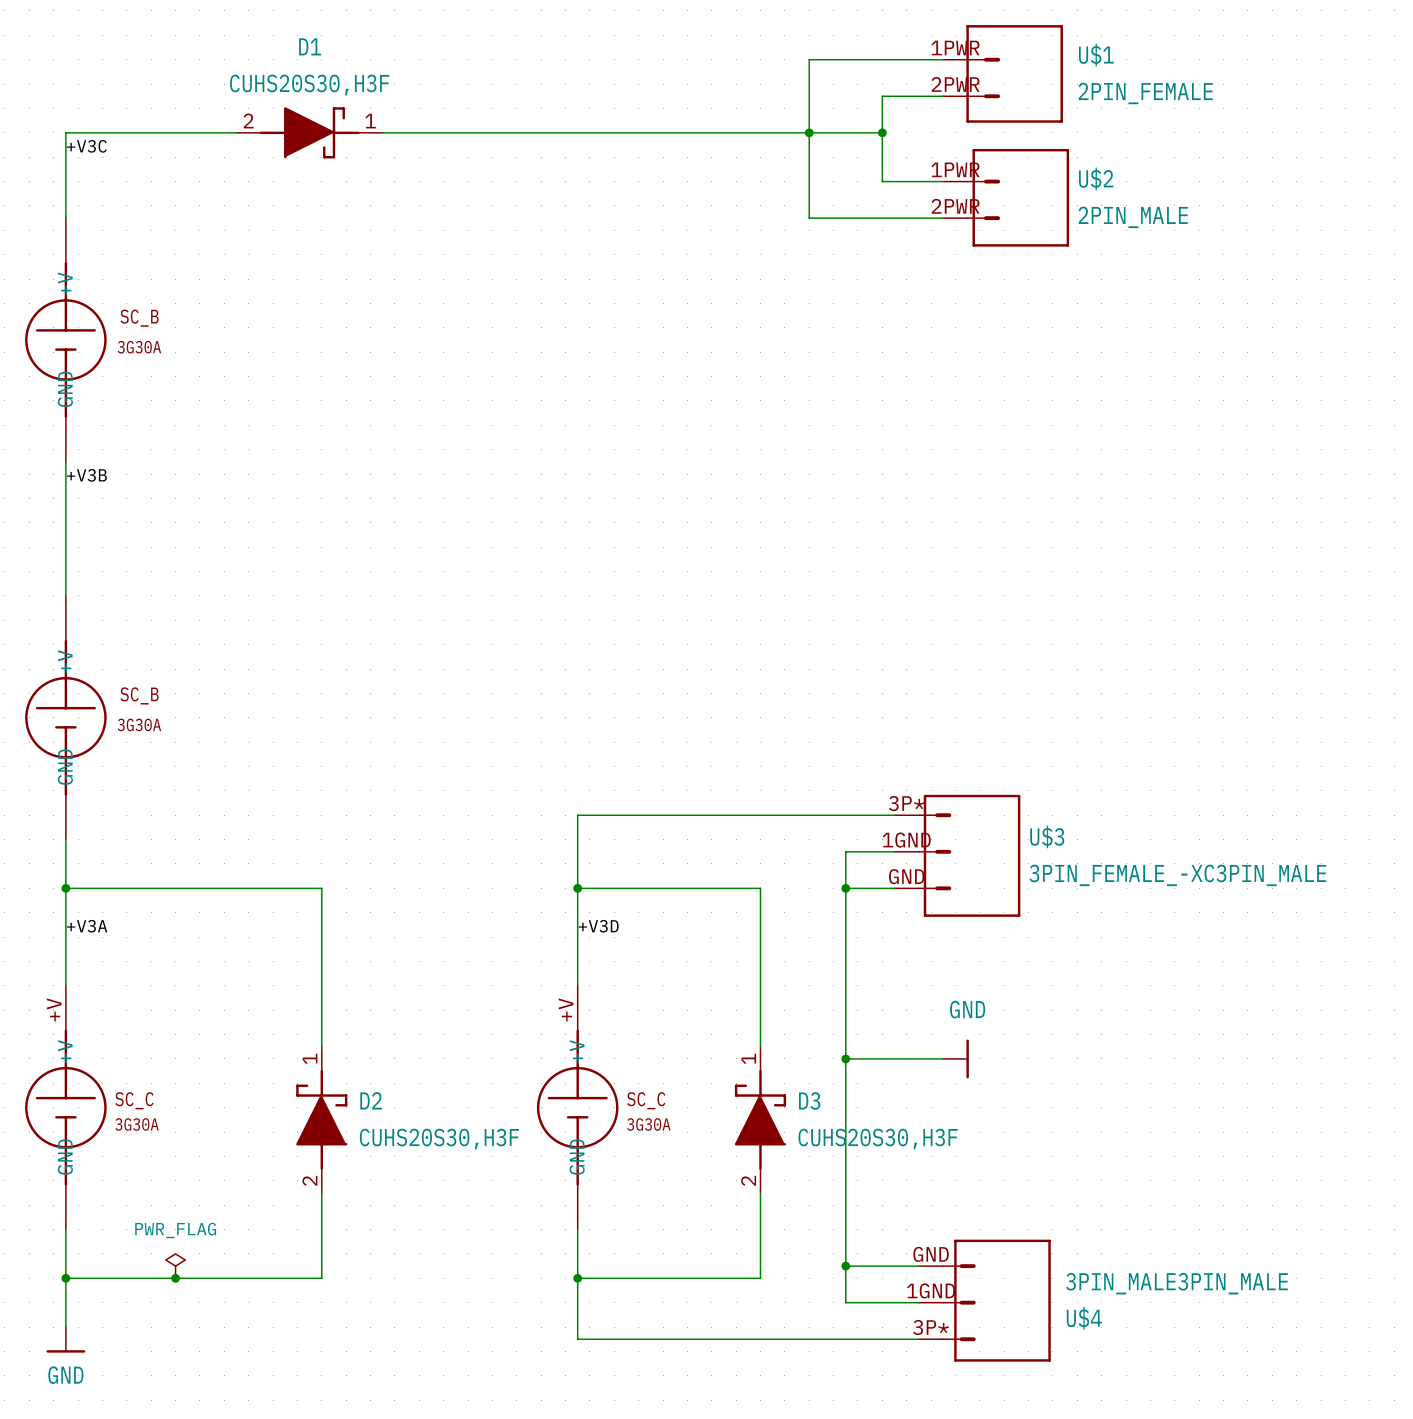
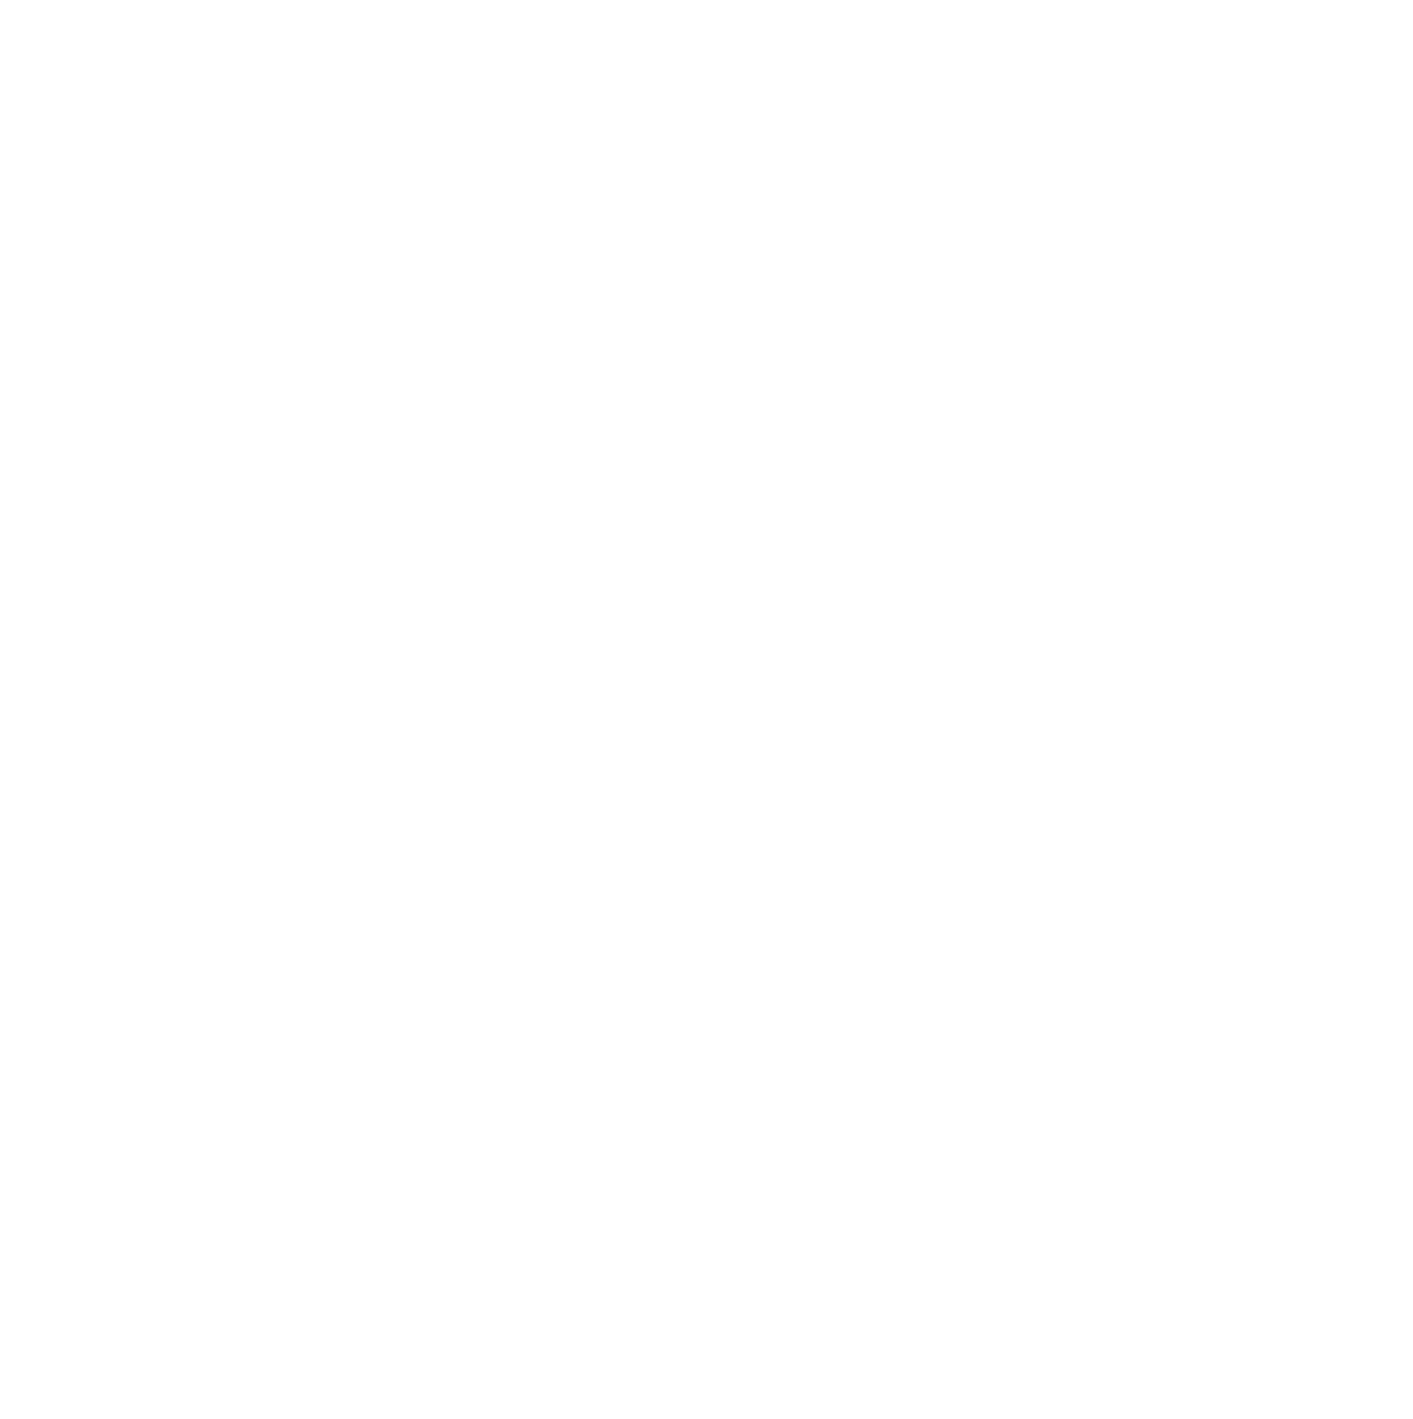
wire: (943, 59) (809, 59) (809, 218) (943, 218) -> none
U$1: 2PIN_FEMALE (1003, 73) -> none
wire: (943, 96) (882, 96) (882, 181) (943, 181) -> none
wire: (236, 132) (65, 132) (65, 218) -> none
D1: CUHS20S30,H3F (309, 132) -> none
wire: (382, 132) (882, 132) -> none
junction: (809, 132) -> none
junction: (882, 132) -> none
label: +V3C (86, 146) -> none
U$2: 2PIN_MALE (1006, 197) -> none
part: (65, 339) -> none
wire: (65, 461) (65, 595) -> none
label: +V3B (86, 475) -> none
part: (65, 717) -> none
wire: (894, 815) (577, 815) (577, 985) -> none
wire: (65, 839) (65, 985) -> none
wire: (894, 851) (845, 851) (845, 1302) (918, 1302) -> none
U$3: 3PIN_FEMALE_-XC3PIN_MALE (957, 855) -> none
wire: (65, 888) (321, 888) (321, 1046) -> none
junction: (65, 888) -> none
wire: (577, 888) (760, 888) (760, 1046) -> none
junction: (577, 888) -> none
wire: (845, 888) (894, 888) -> none
junction: (845, 888) -> none
label: +V3A (87, 926) -> none
label: +V3D (598, 926) -> none
wire: (845, 1058) (943, 1058) -> none
junction: (845, 1058) -> none
power symbol: GND (956, 1058) -> none
part: (65, 1107) -> none
part: (577, 1107) -> none
D2: CUHS20S30,H3F (321, 1119) -> none
D3: CUHS20S30,H3F (760, 1119) -> none
wire: (321, 1193) (321, 1278) (65, 1278) -> none
wire: (760, 1193) (760, 1278) (577, 1278) -> none
wire: (65, 1229) (65, 1327) -> none
wire: (577, 1229) (577, 1339) (918, 1339) -> none
power symbol: PWR_FLAG (175, 1266) -> none
wire: (845, 1266) (918, 1266) -> none
junction: (845, 1266) -> none
junction: (65, 1278) -> none
junction: (175, 1278) -> none
junction: (577, 1278) -> none
U$4: 3PIN_MALE3PIN_MALE (984, 1300) -> none
power symbol: GND (65, 1339) -> none

